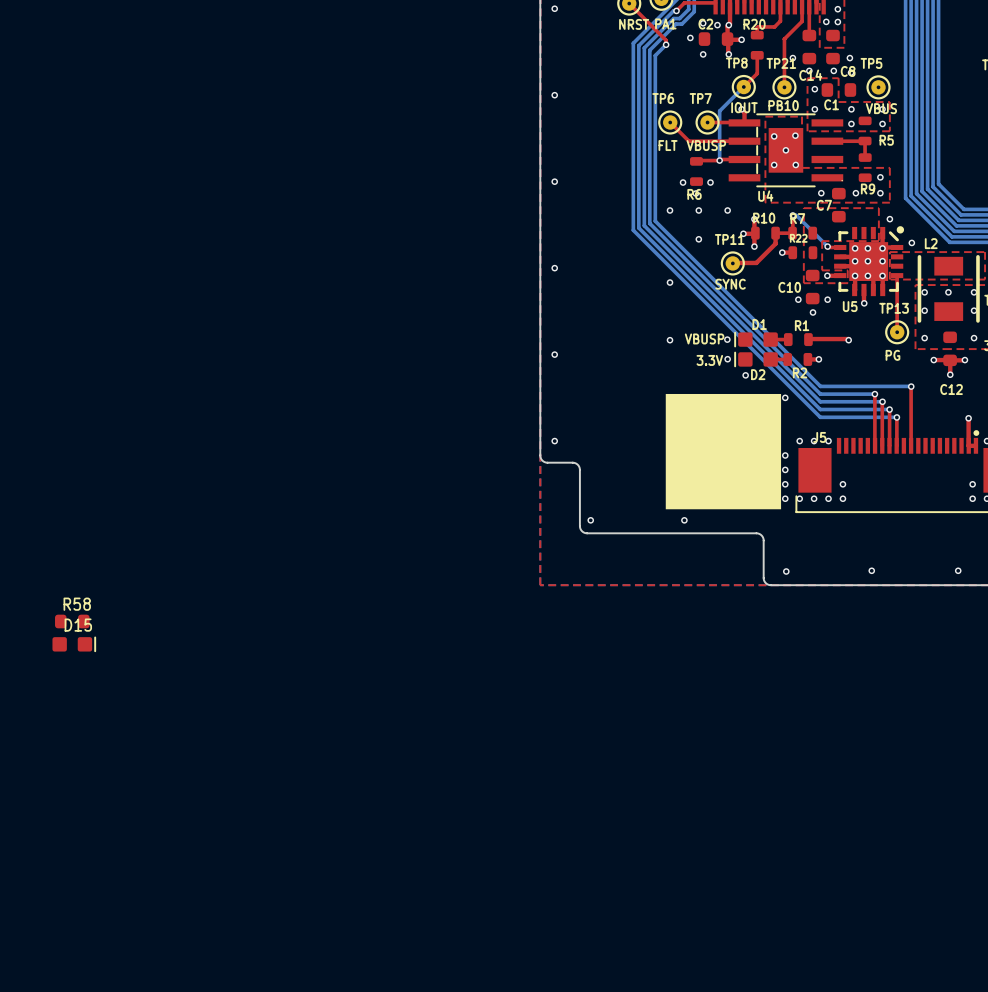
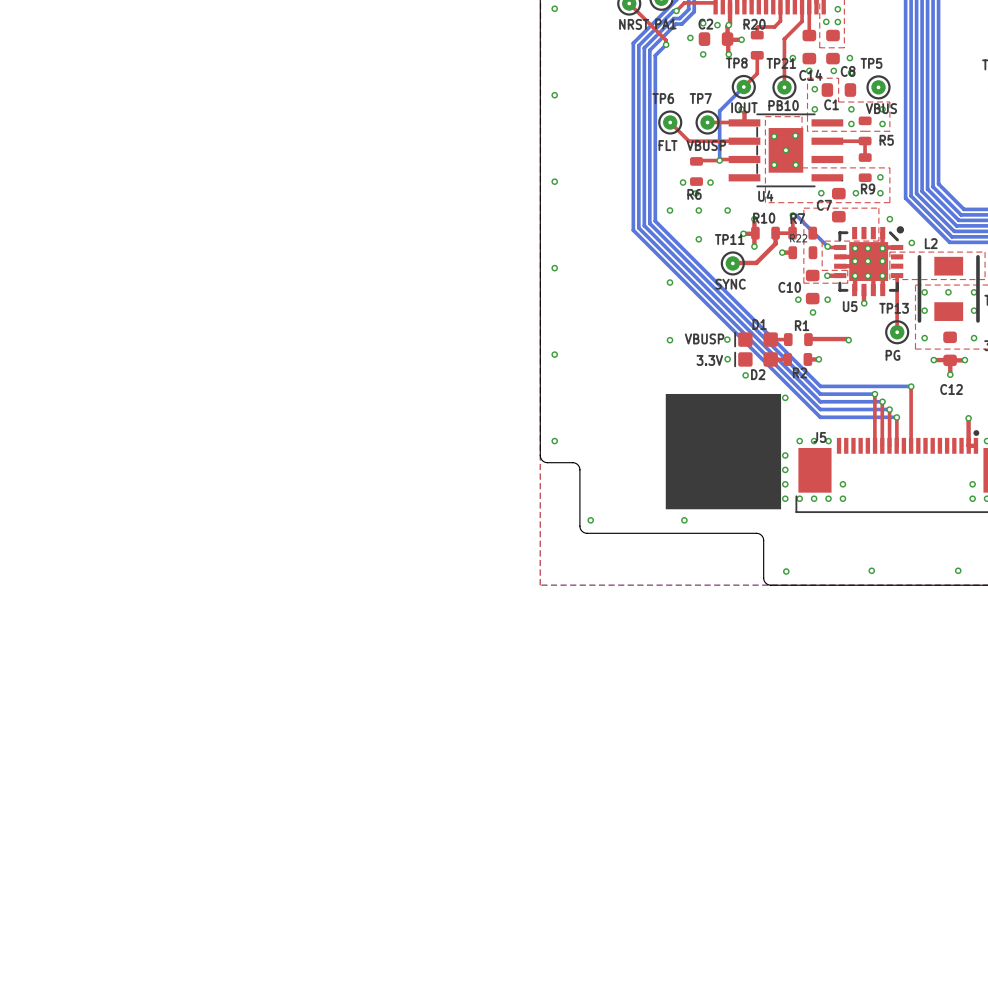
R58: (72, 621) -> none
D15: (74, 644) -> none

